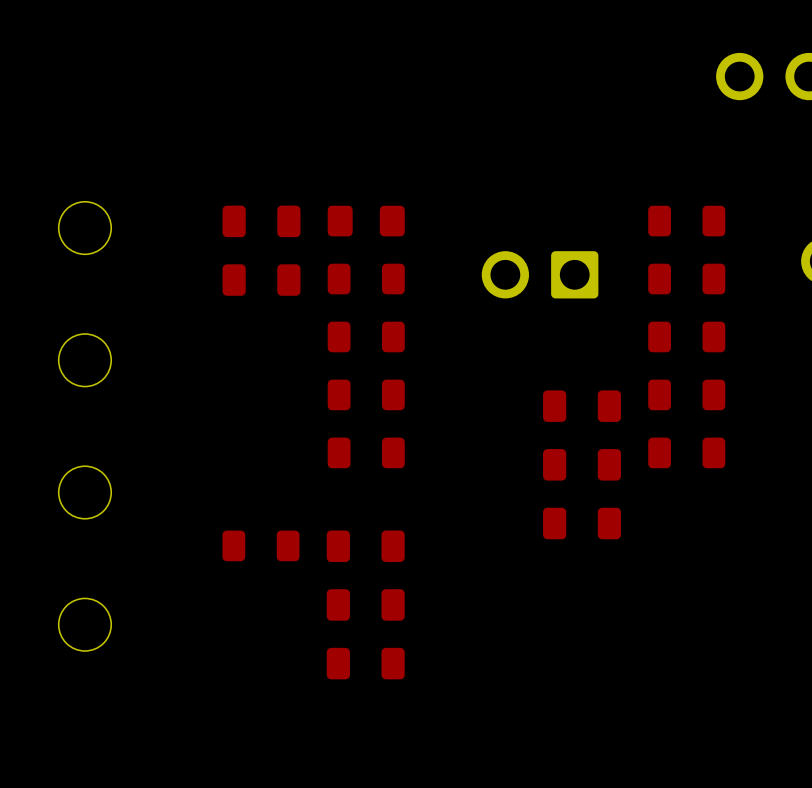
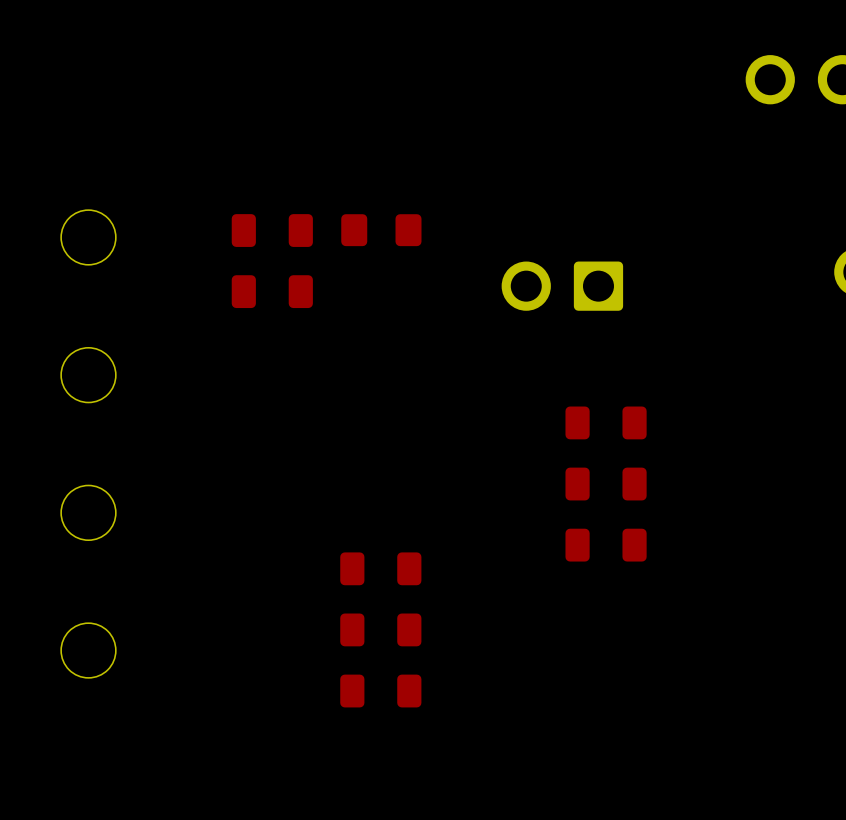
part: (686, 221) -> none
part: (366, 279) -> none
part: (686, 279) -> none
part: (366, 336) -> none
part: (686, 336) -> none
part: (366, 394) -> none
part: (686, 394) -> none
part: (366, 452) -> none
part: (686, 452) -> none
part: (260, 545) -> none

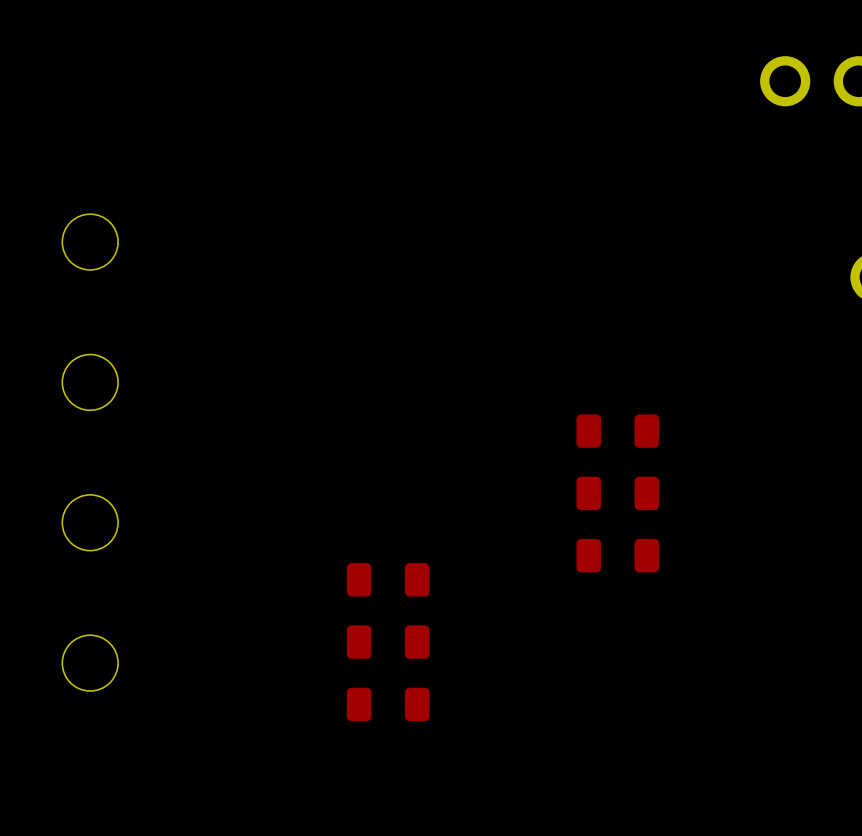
part: (272, 230) -> none
part: (381, 230) -> none
part: (562, 286) -> none
part: (272, 291) -> none

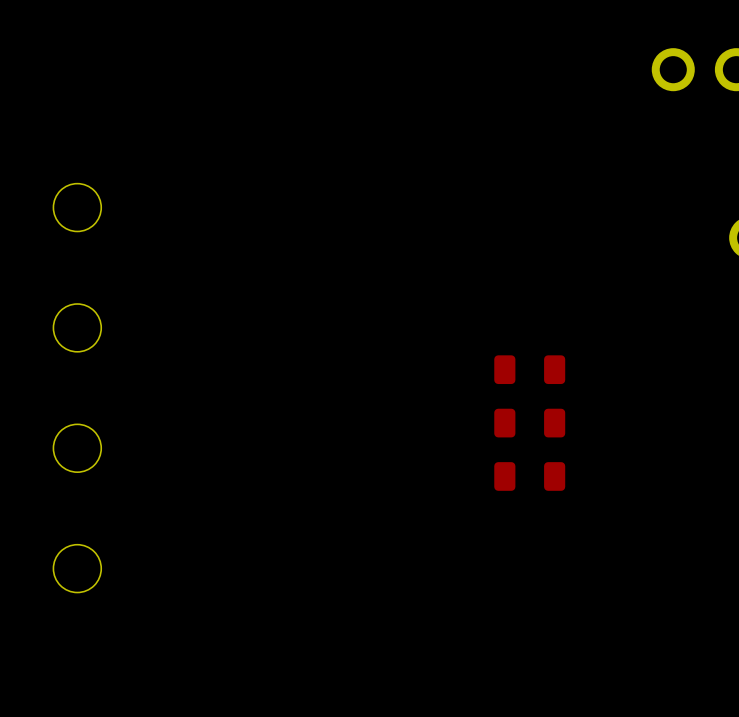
part: (388, 579) -> none
part: (388, 642) -> none
part: (388, 704) -> none

